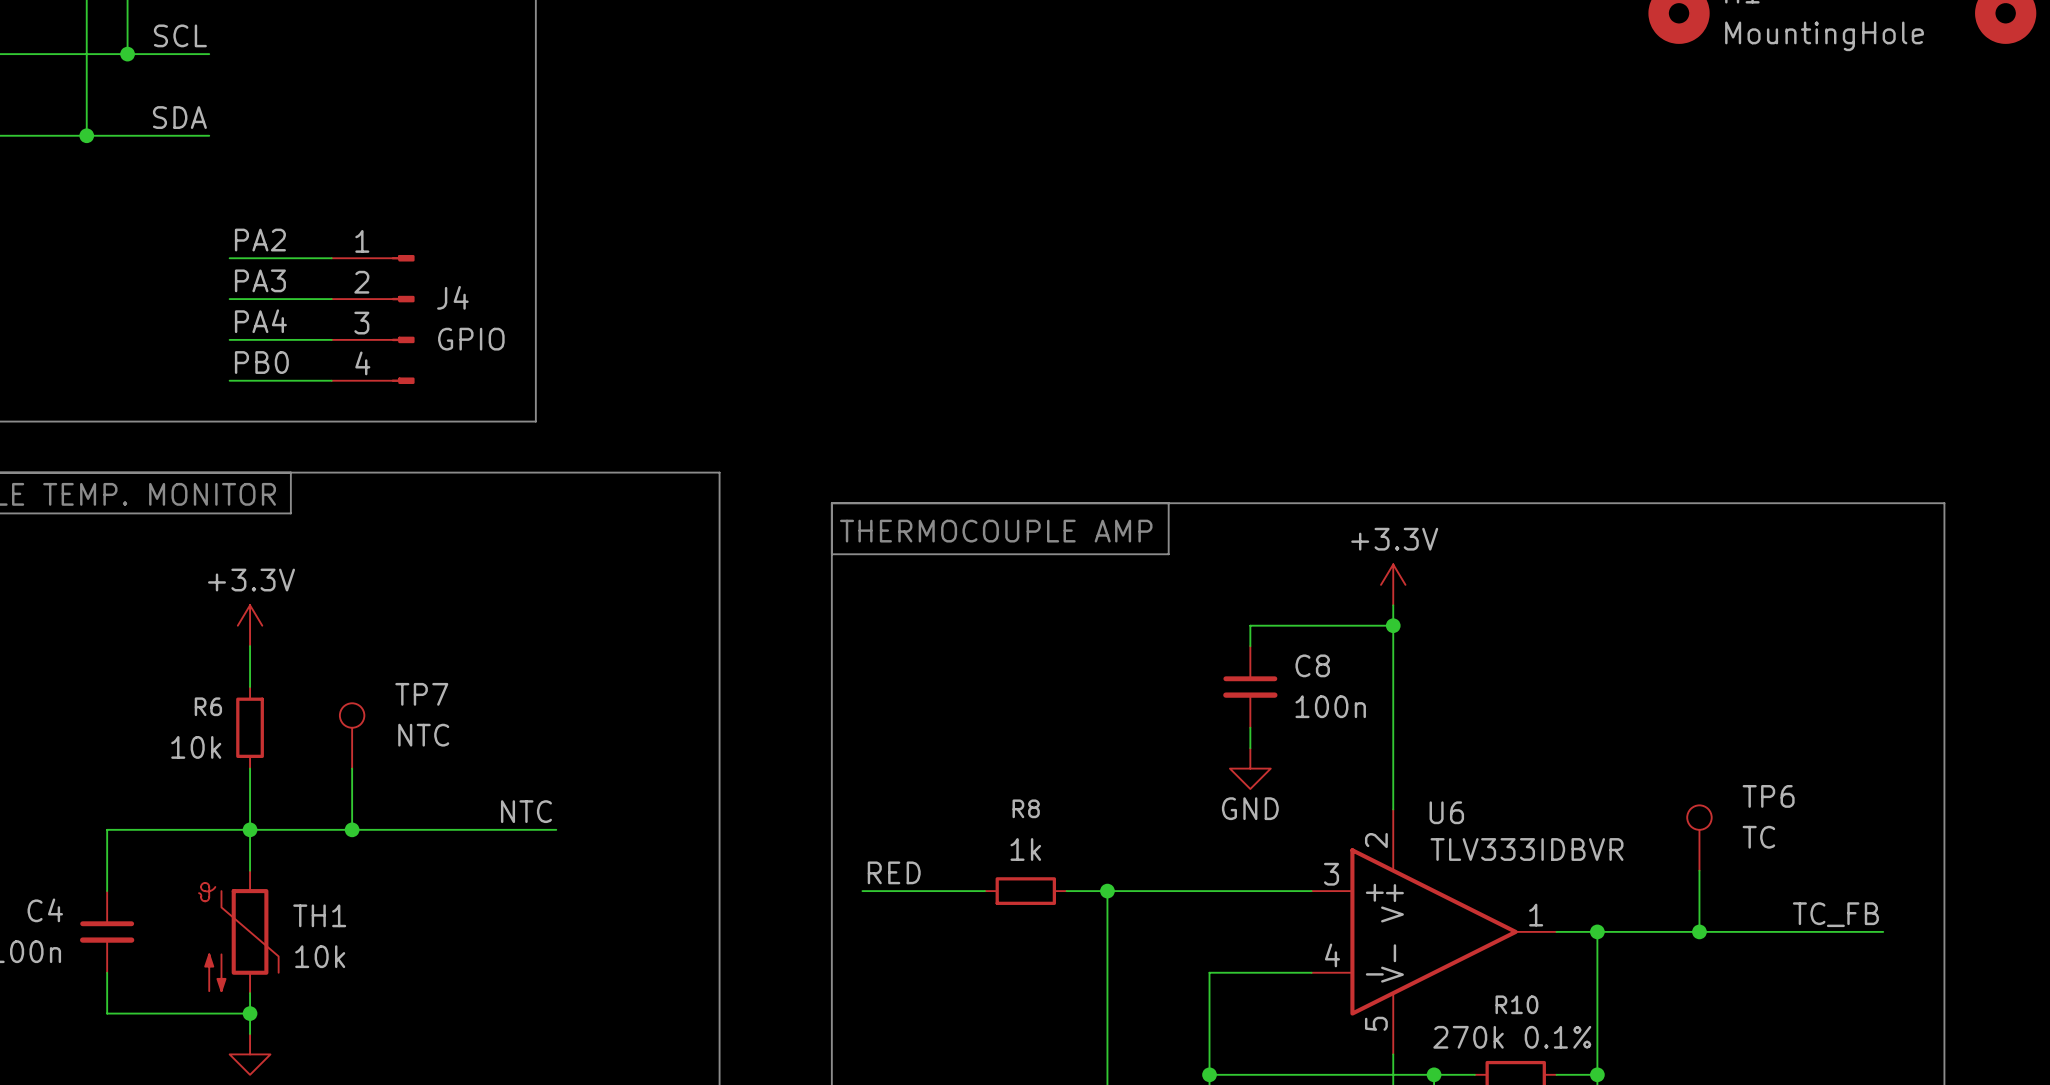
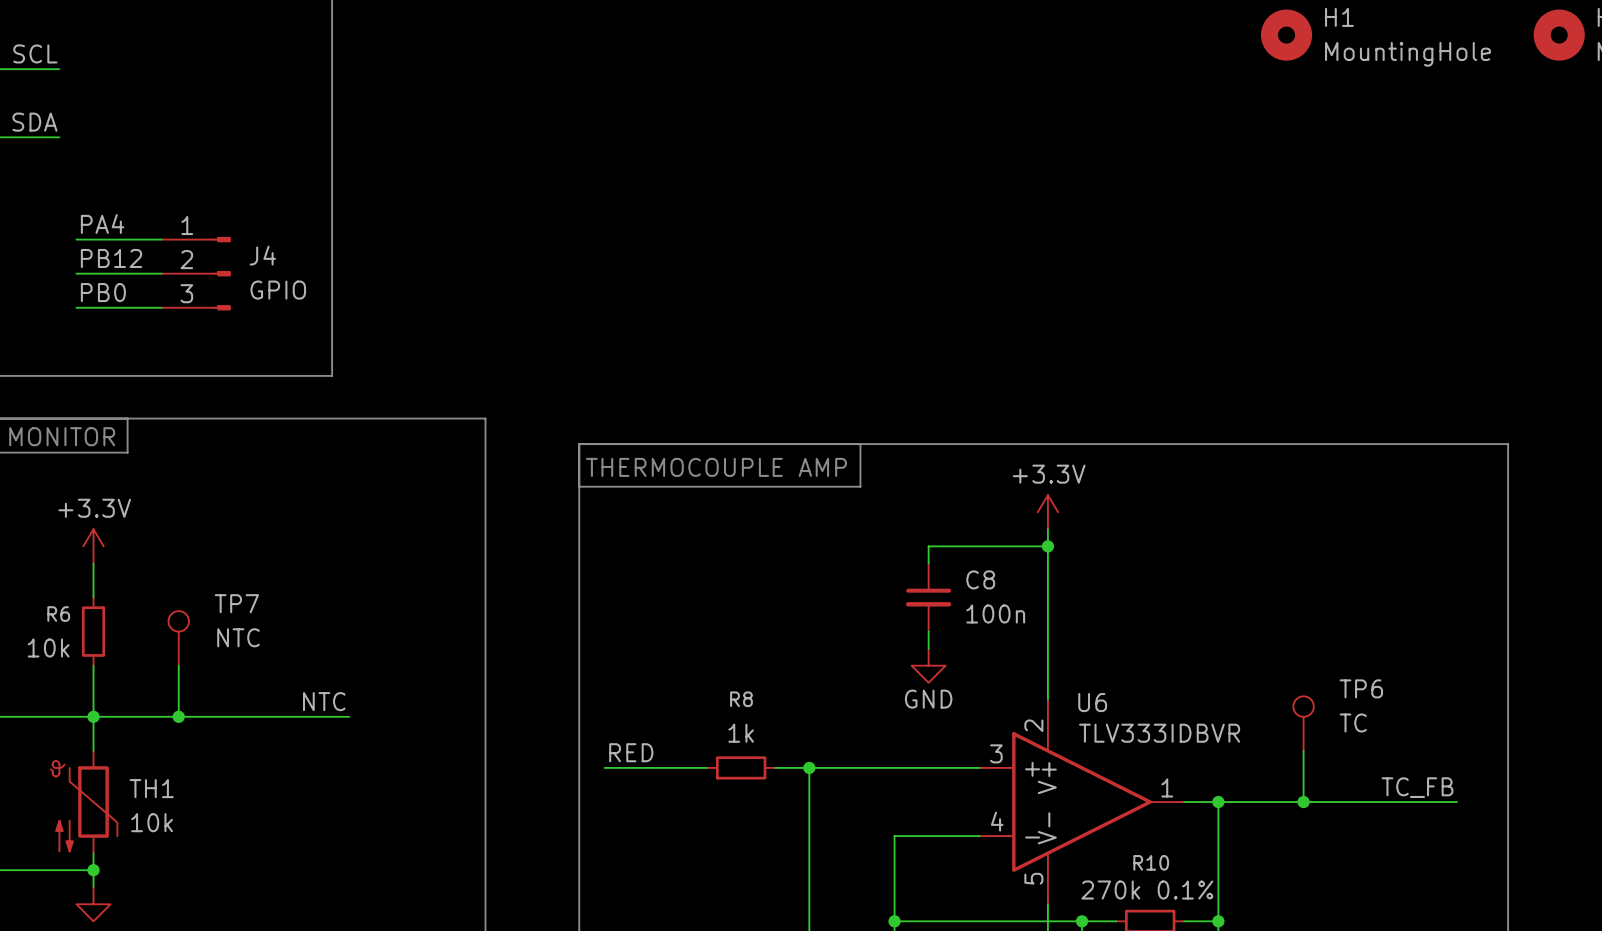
label: PA2 (260, 240) -> PA4 (102, 223)
J4 symbol: [331, 254, 415, 385] -> [161, 236, 231, 311]
label: PA3 (260, 280) -> PB12 (111, 258)
label: PA4 (260, 321) -> PB0 (103, 292)
label: PB0 (261, 362) -> none
wire: (229, 380) (331, 380) -> none

